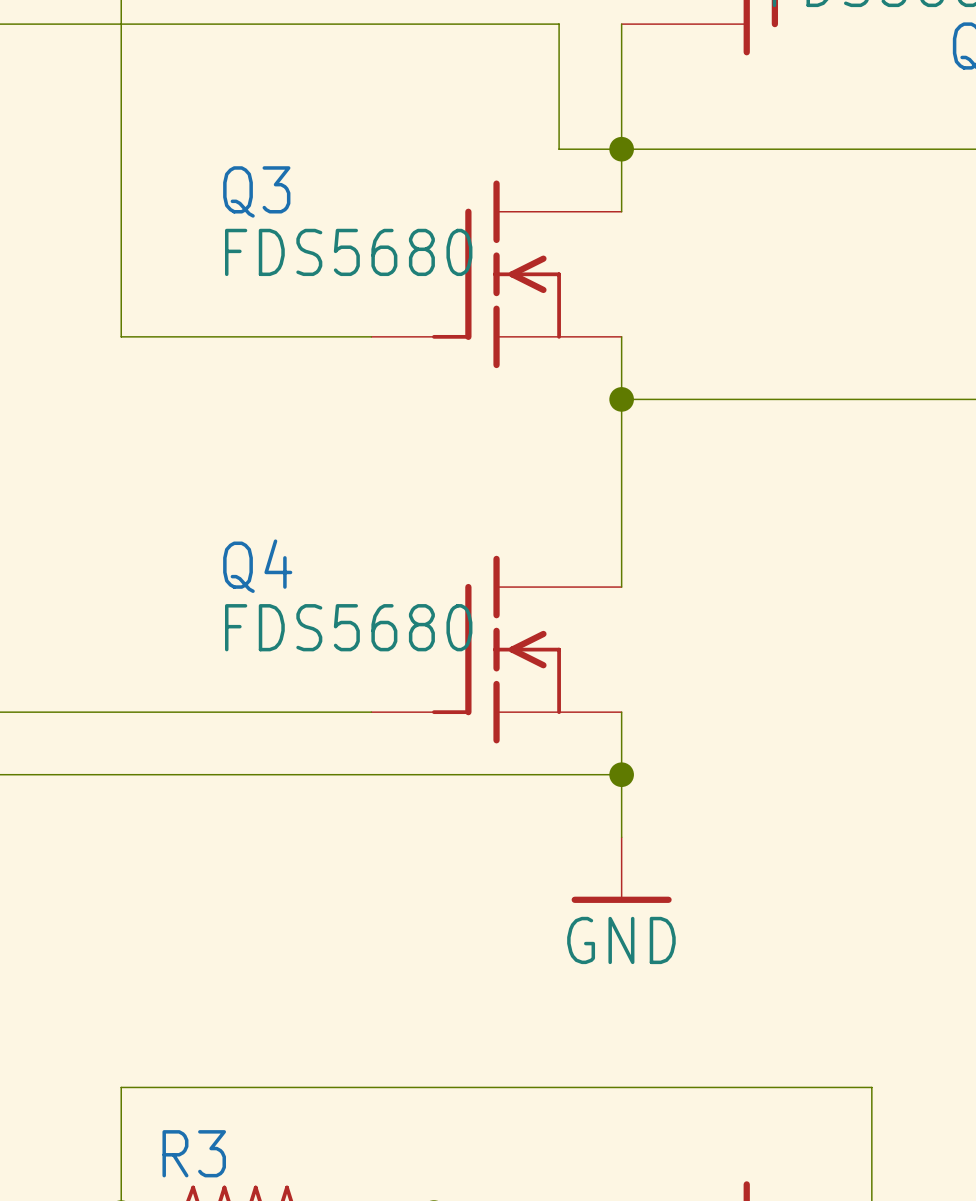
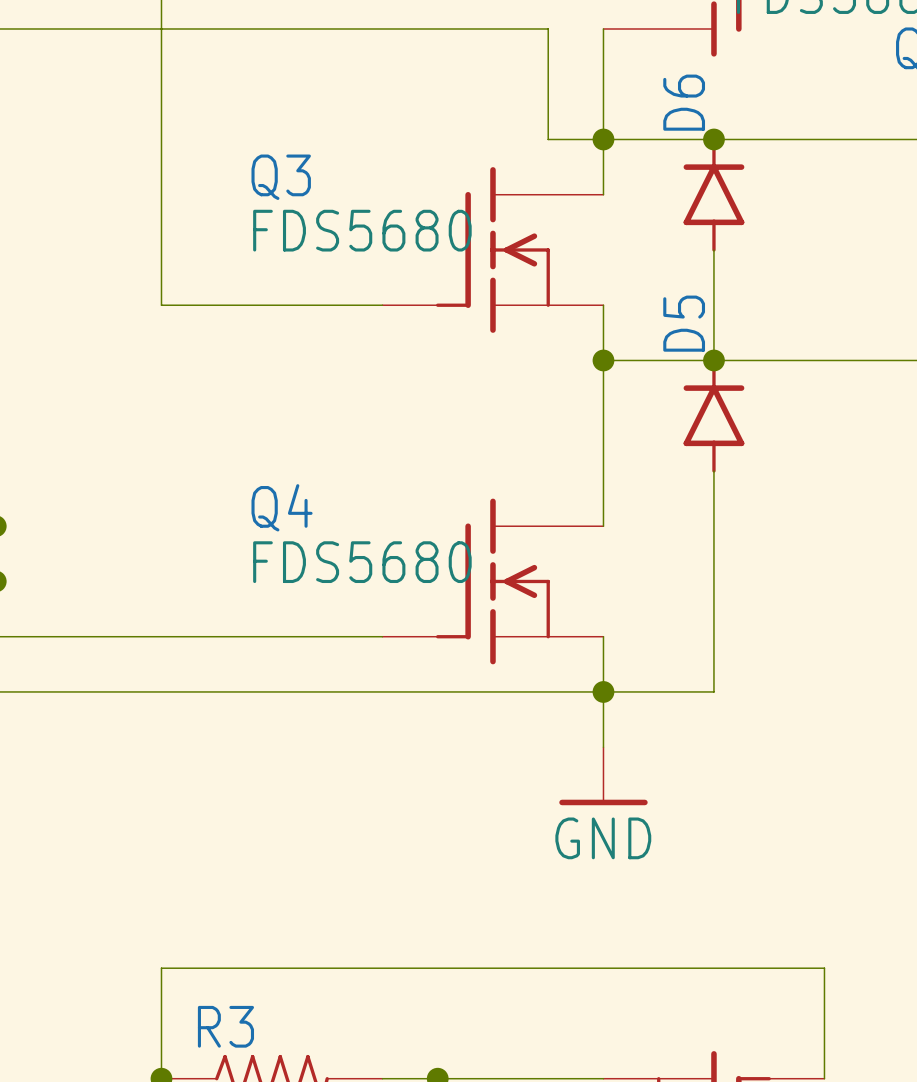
junction: none -> (713, 139)
D6: none -> (713, 194)
wire: none -> (713, 249) (713, 360)
junction: none -> (713, 360)
D5: none -> (713, 415)
wire: none -> (713, 470) (713, 691) (603, 691)

